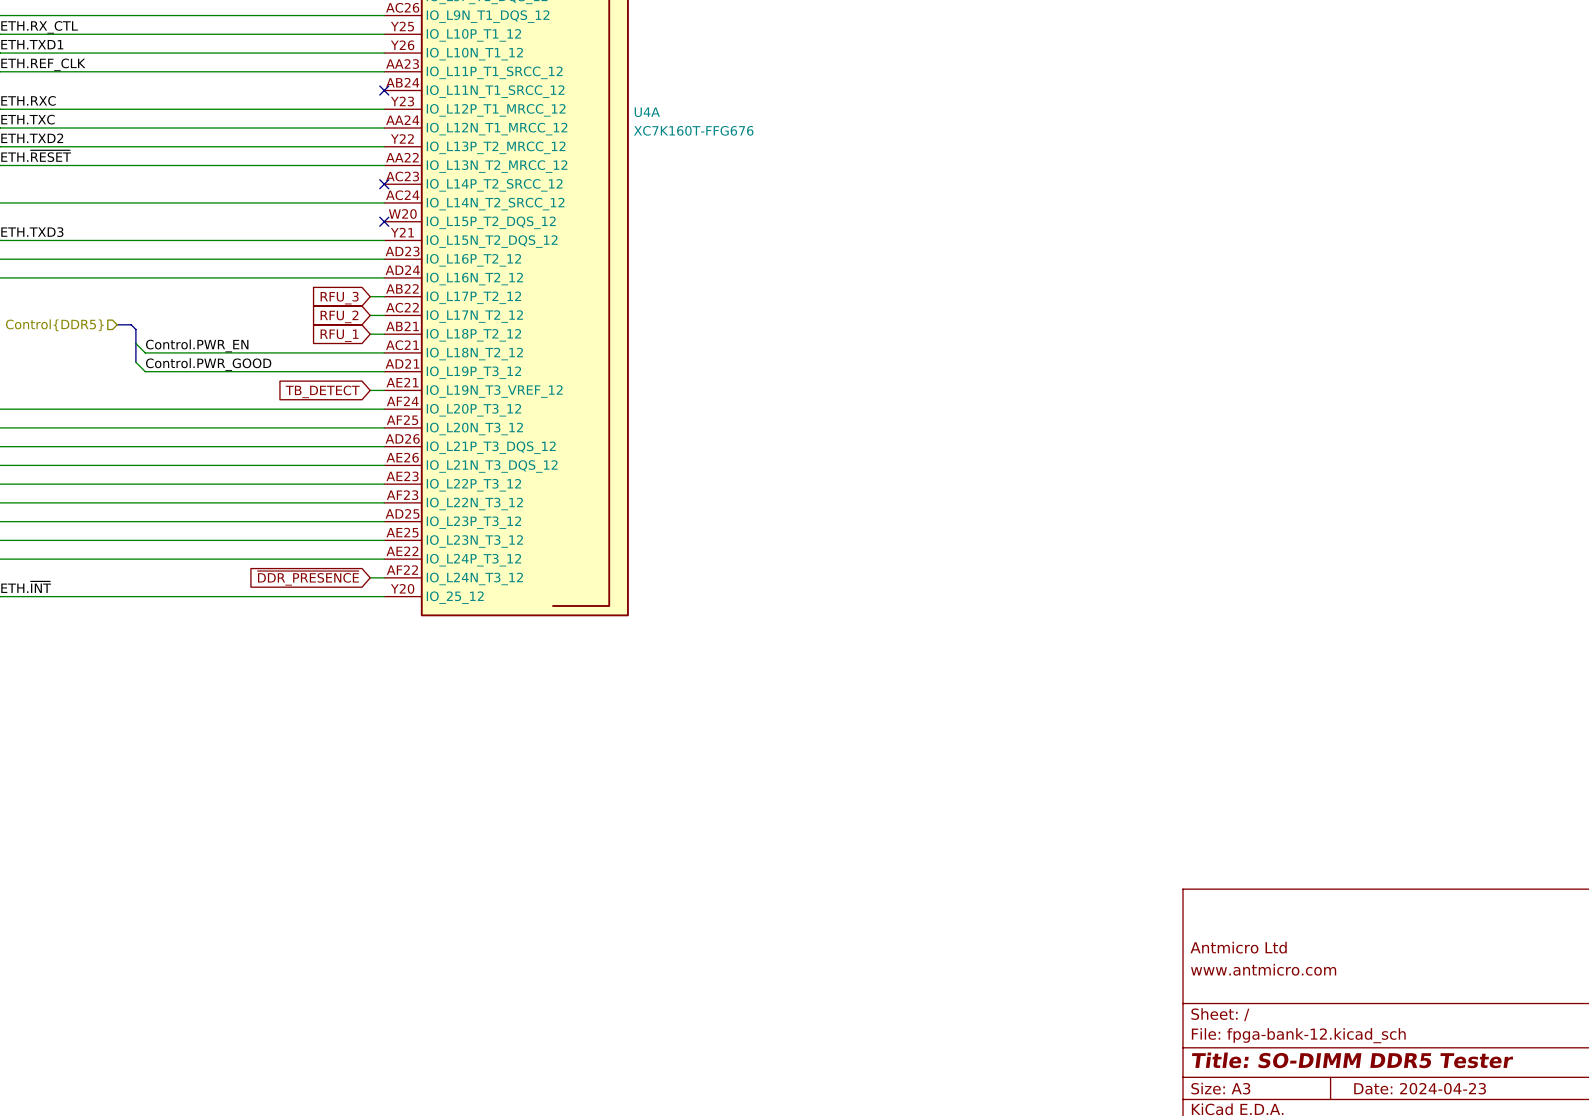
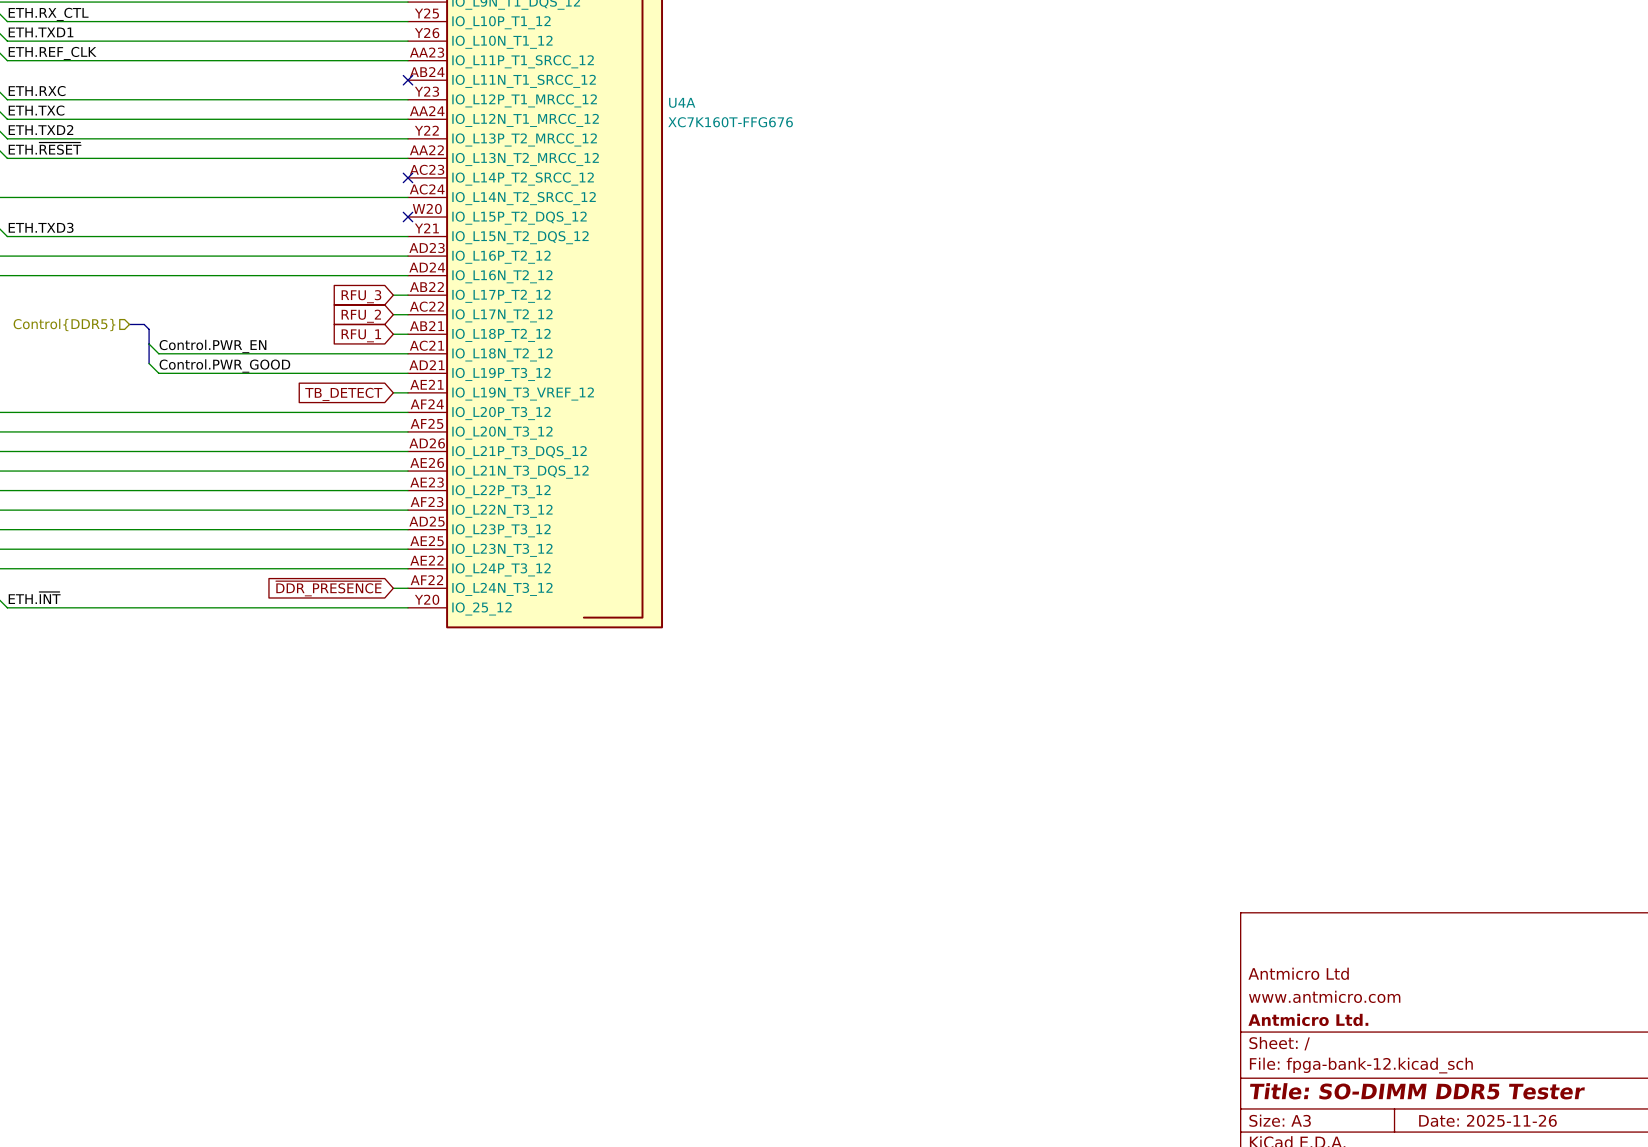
title block: none -> Antmicro Ltd. (1308, 1019)
title block: Date: 2024-04-23 (1420, 1088) -> Date: 2025-11-26 (1487, 1120)

